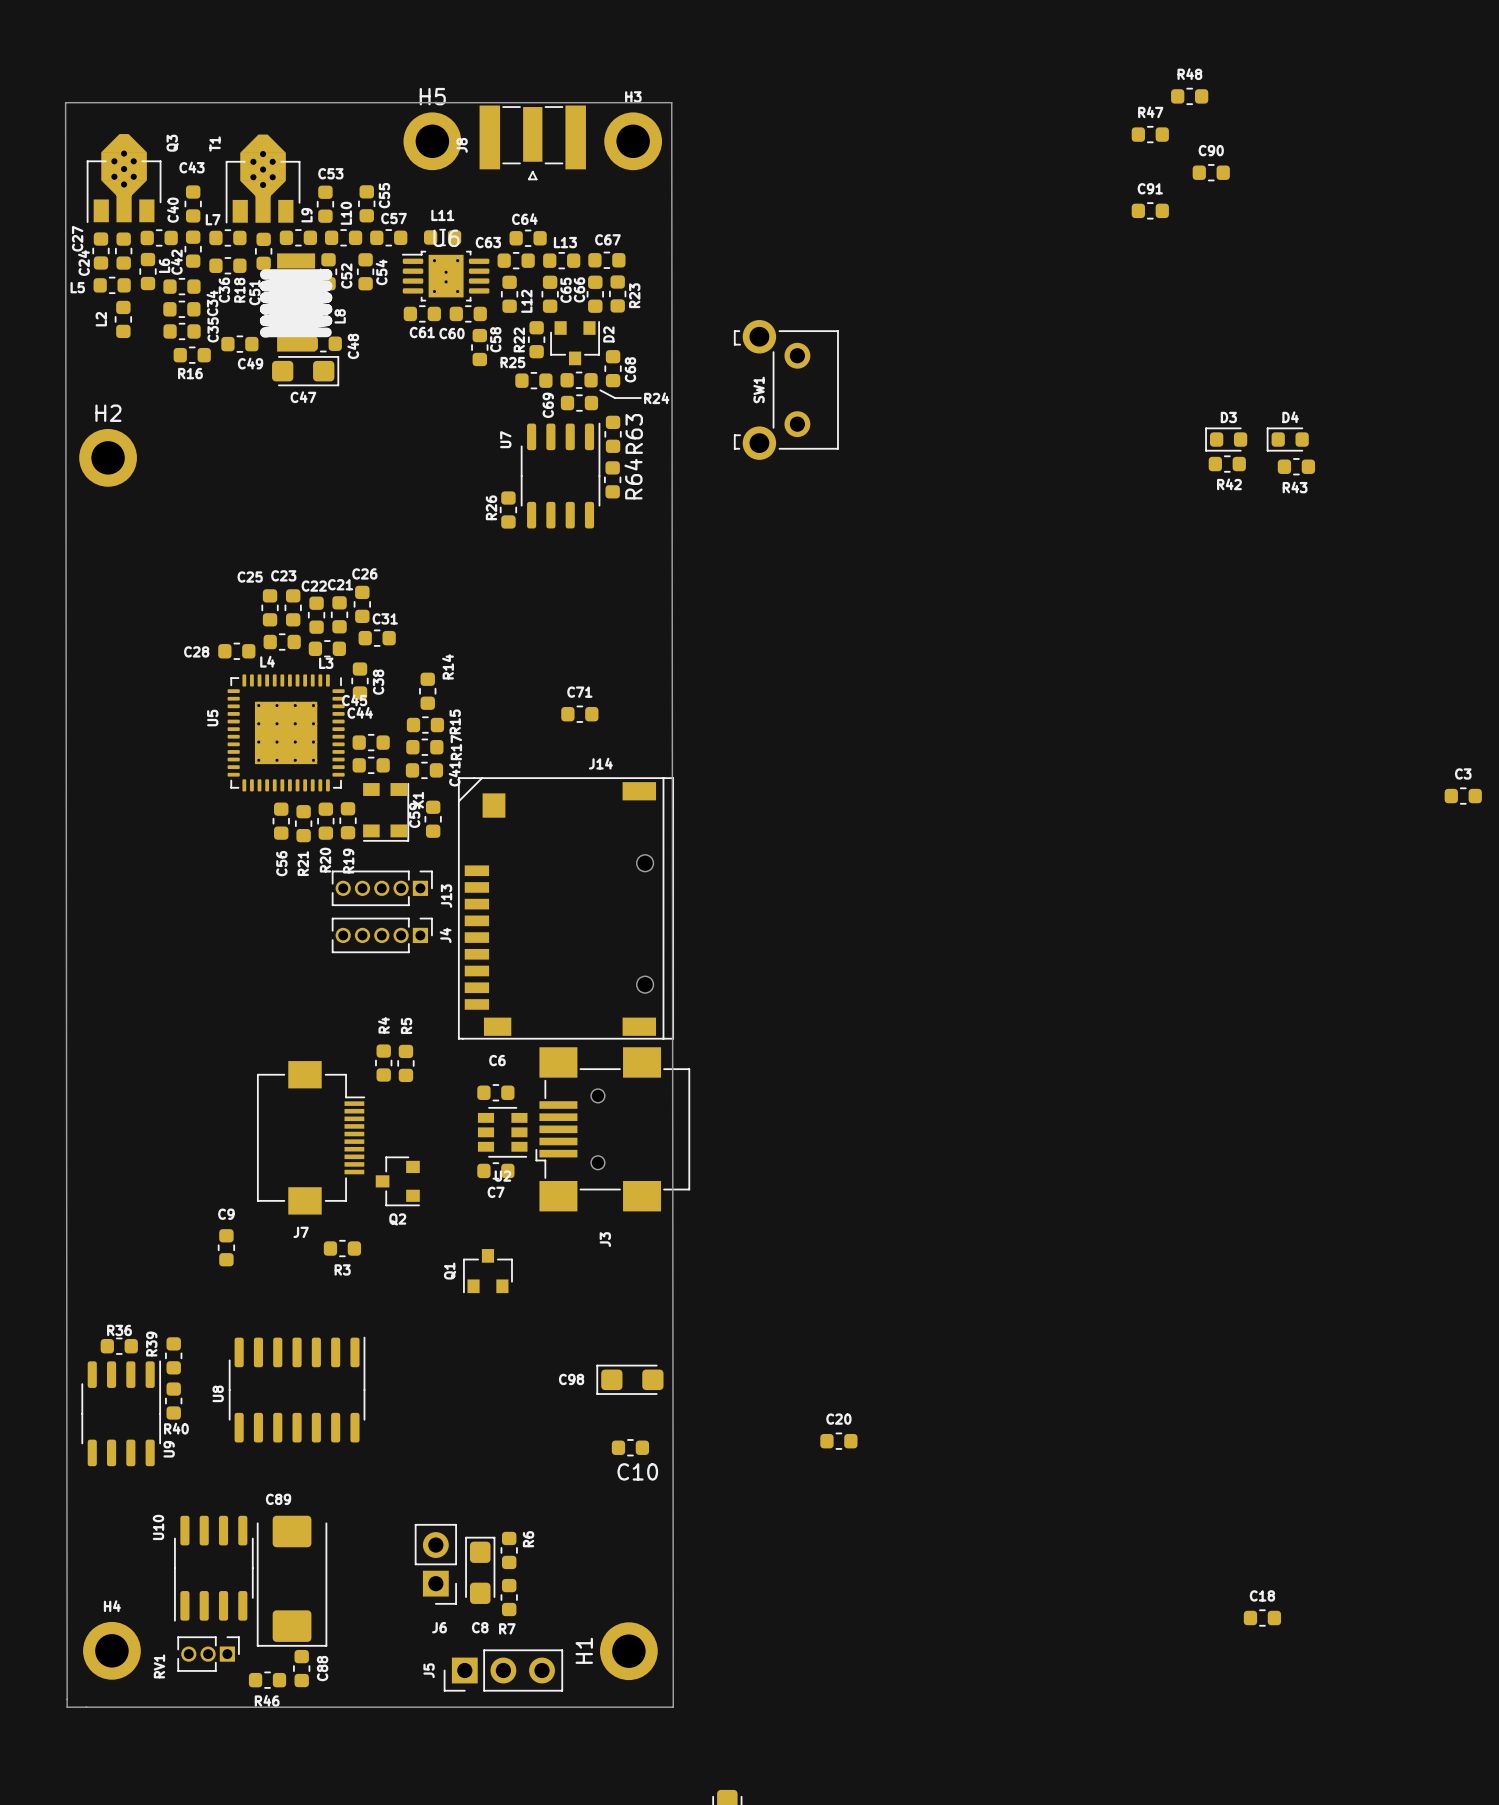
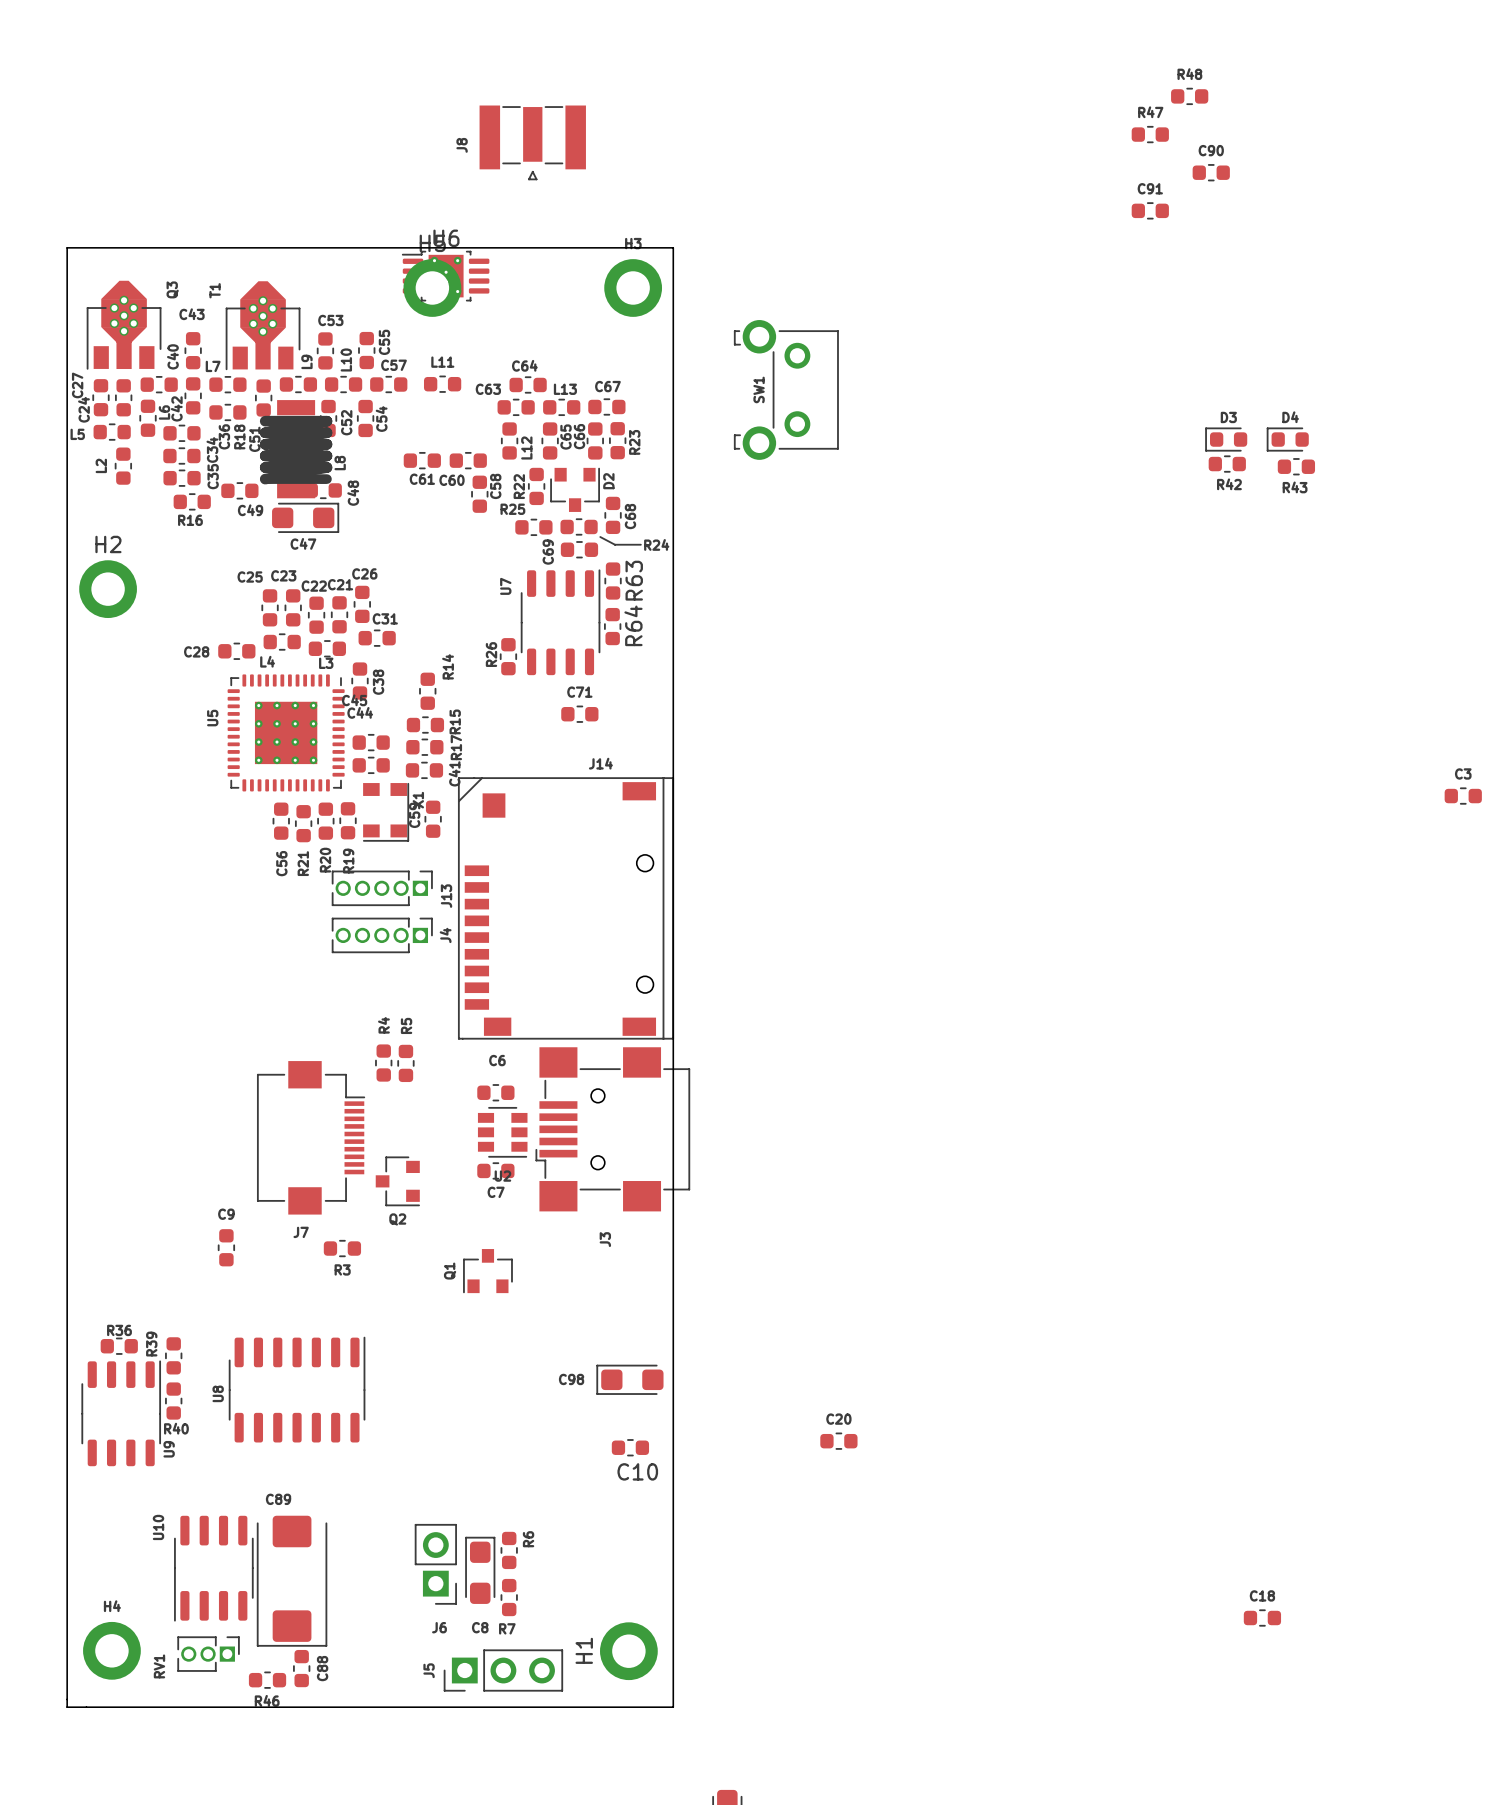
H5 position: (432, 141) -> (432, 287)
H3 position: (633, 141) -> (633, 287)
Q3 position: (124, 178) -> (124, 325)
T1 position: (263, 179) -> (263, 325)
C43 position: (193, 203) -> (193, 350)
C55 position: (366, 203) -> (366, 350)
C53 position: (325, 204) -> (325, 350)
C40 position: (159, 237) -> (159, 384)
L7 position: (227, 237) -> (227, 384)
L9 position: (298, 237) -> (298, 384)
L10 position: (343, 237) -> (343, 384)
C57 position: (388, 237) -> (388, 384)
L11 position: (442, 237) -> (442, 384)
C64 position: (528, 238) -> (528, 384)
C42 position: (193, 249) -> (193, 395)
C27 position: (100, 251) -> (100, 397)
C24 position: (123, 251) -> (123, 397)
C51 position: (263, 251) -> (263, 398)
C63 position: (516, 260) -> (516, 407)
L13 position: (561, 260) -> (561, 407)
C67 position: (606, 260) -> (606, 406)
R18 position: (227, 265) -> (227, 412)
L6 position: (148, 271) -> (148, 418)
C52 position: (328, 271) -> (328, 418)
C54 position: (365, 271) -> (365, 418)
L5 position: (112, 285) -> (112, 432)
C36 position: (181, 286) -> (181, 433)
R23 position: (617, 293) -> (617, 440)
L12 position: (509, 294) -> (509, 440)
C65 position: (550, 294) -> (550, 440)
C66 position: (595, 294) -> (595, 440)
L8 position: (296, 302) -> (296, 449)
C34 position: (181, 309) -> (181, 456)
C61 position: (422, 313) -> (422, 460)
C60 position: (468, 313) -> (468, 460)
L2 position: (123, 319) -> (123, 466)
C35 position: (182, 331) -> (182, 478)
R22 position: (536, 339) -> (536, 486)
C48 position: (323, 343) -> (323, 490)
D2 position: (575, 343) -> (575, 489)
C49 position: (239, 344) -> (239, 490)
C58 position: (479, 347) -> (479, 494)
R16 position: (192, 355) -> (192, 501)
C68 position: (613, 368) -> (613, 515)
C47 position: (305, 371) -> (305, 517)
R25 position: (533, 380) -> (533, 527)
R24 position: (579, 380) -> (579, 526)
line: (600, 390) (614, 398) (640, 398) -> (600, 537) (614, 544) (640, 544)
C69 position: (579, 403) -> (579, 549)
R63 position: (613, 434) -> (613, 581)
H2 position: (108, 457) -> (108, 589)
U7 position: (560, 475) -> (560, 622)
R64 position: (612, 479) -> (612, 626)
R26 position: (508, 509) -> (508, 656)
board edge: (67, 1699) (65, 102) (671, 102) (673, 1707) -> (67, 1699) (67, 247) (673, 247) (673, 1707)

